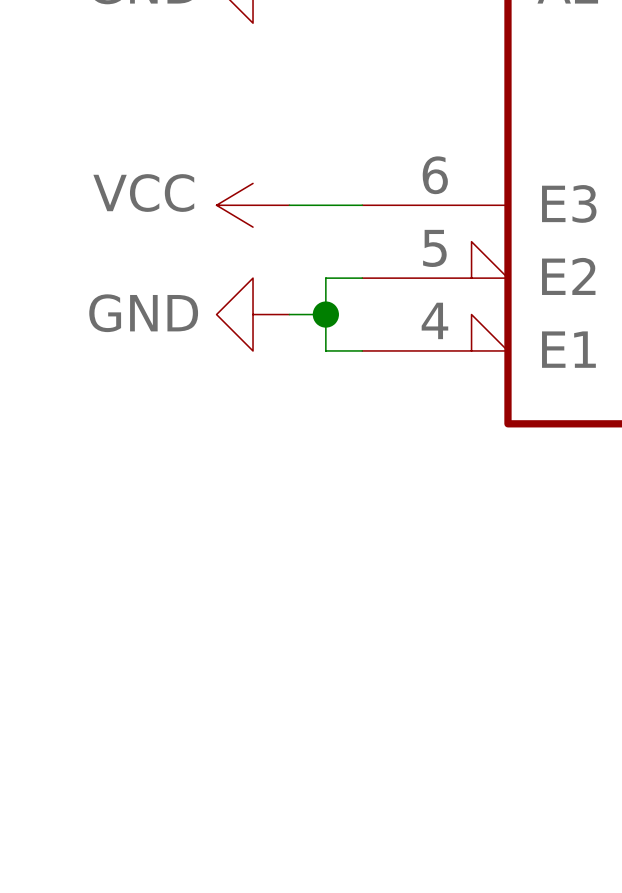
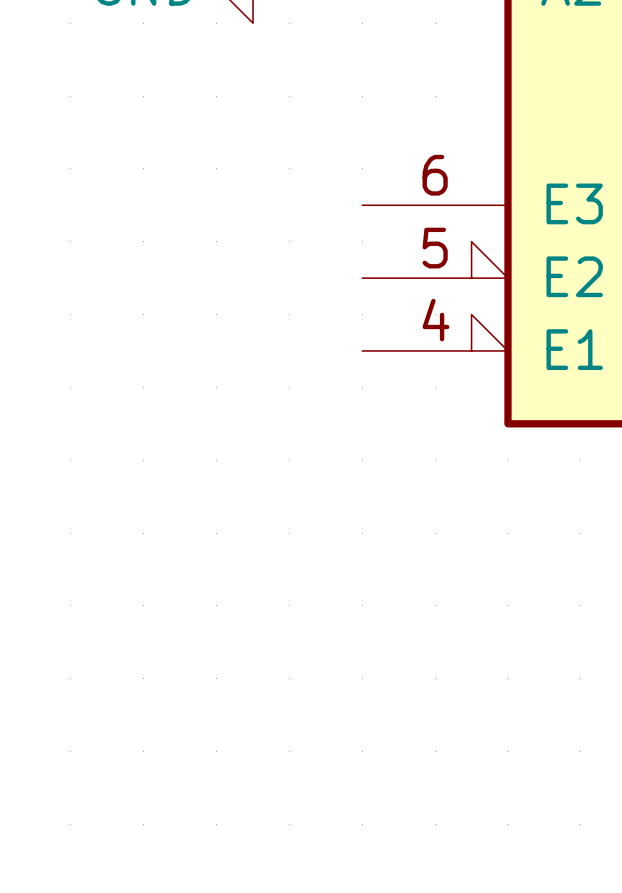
power symbol: VCC (253, 205) -> none
wire: (289, 205) (362, 205) -> none
wire: (362, 278) (325, 278) (325, 350) (362, 350) -> none
power symbol: GND (253, 314) -> none
wire: (289, 314) (325, 314) -> none
junction: (325, 314) -> none

